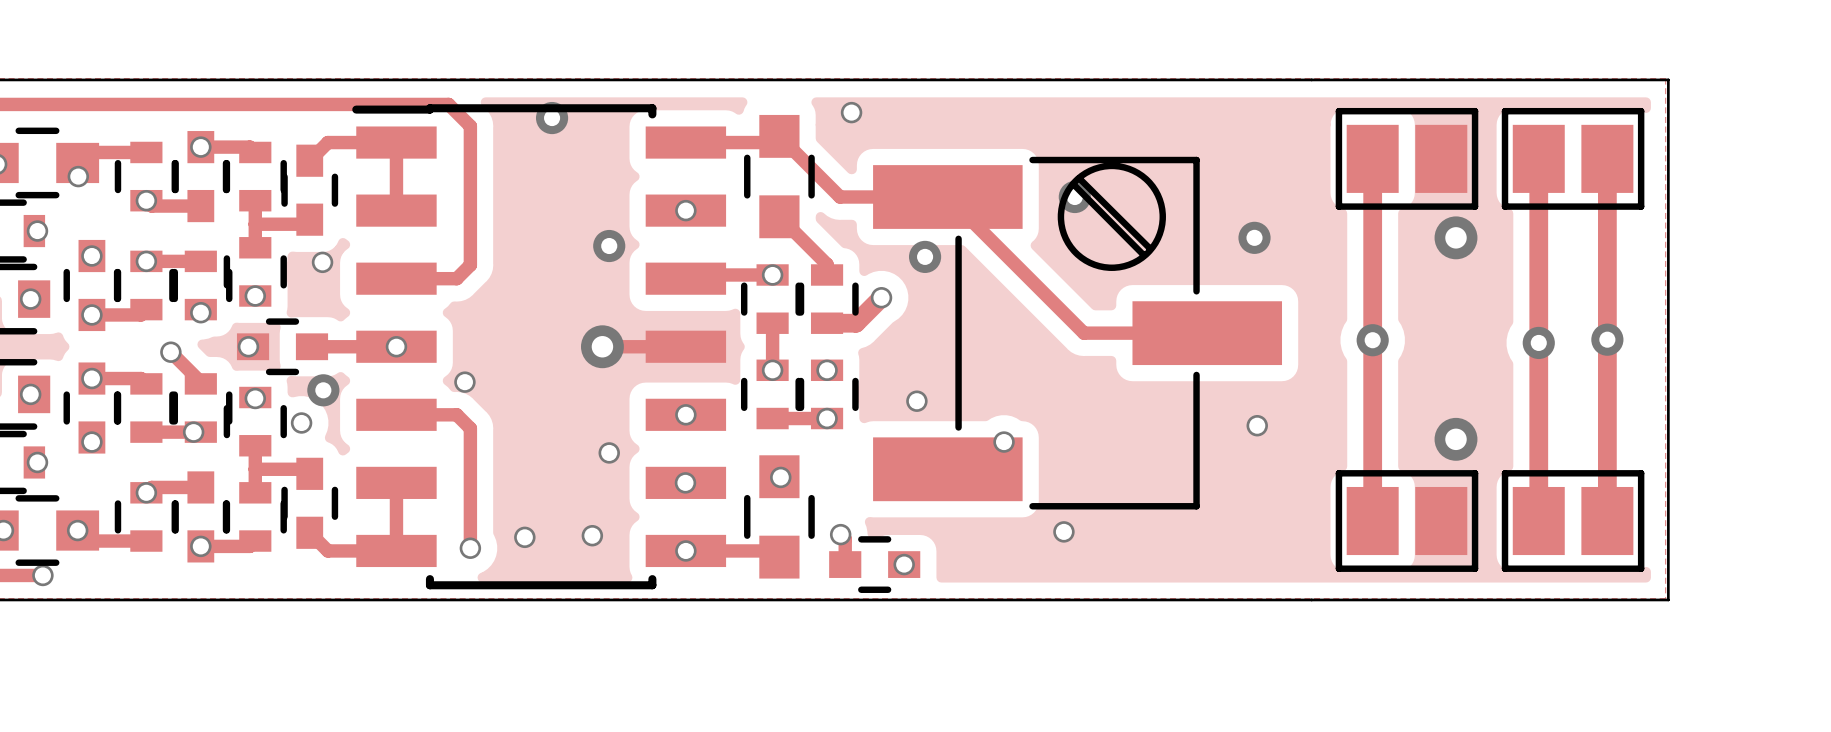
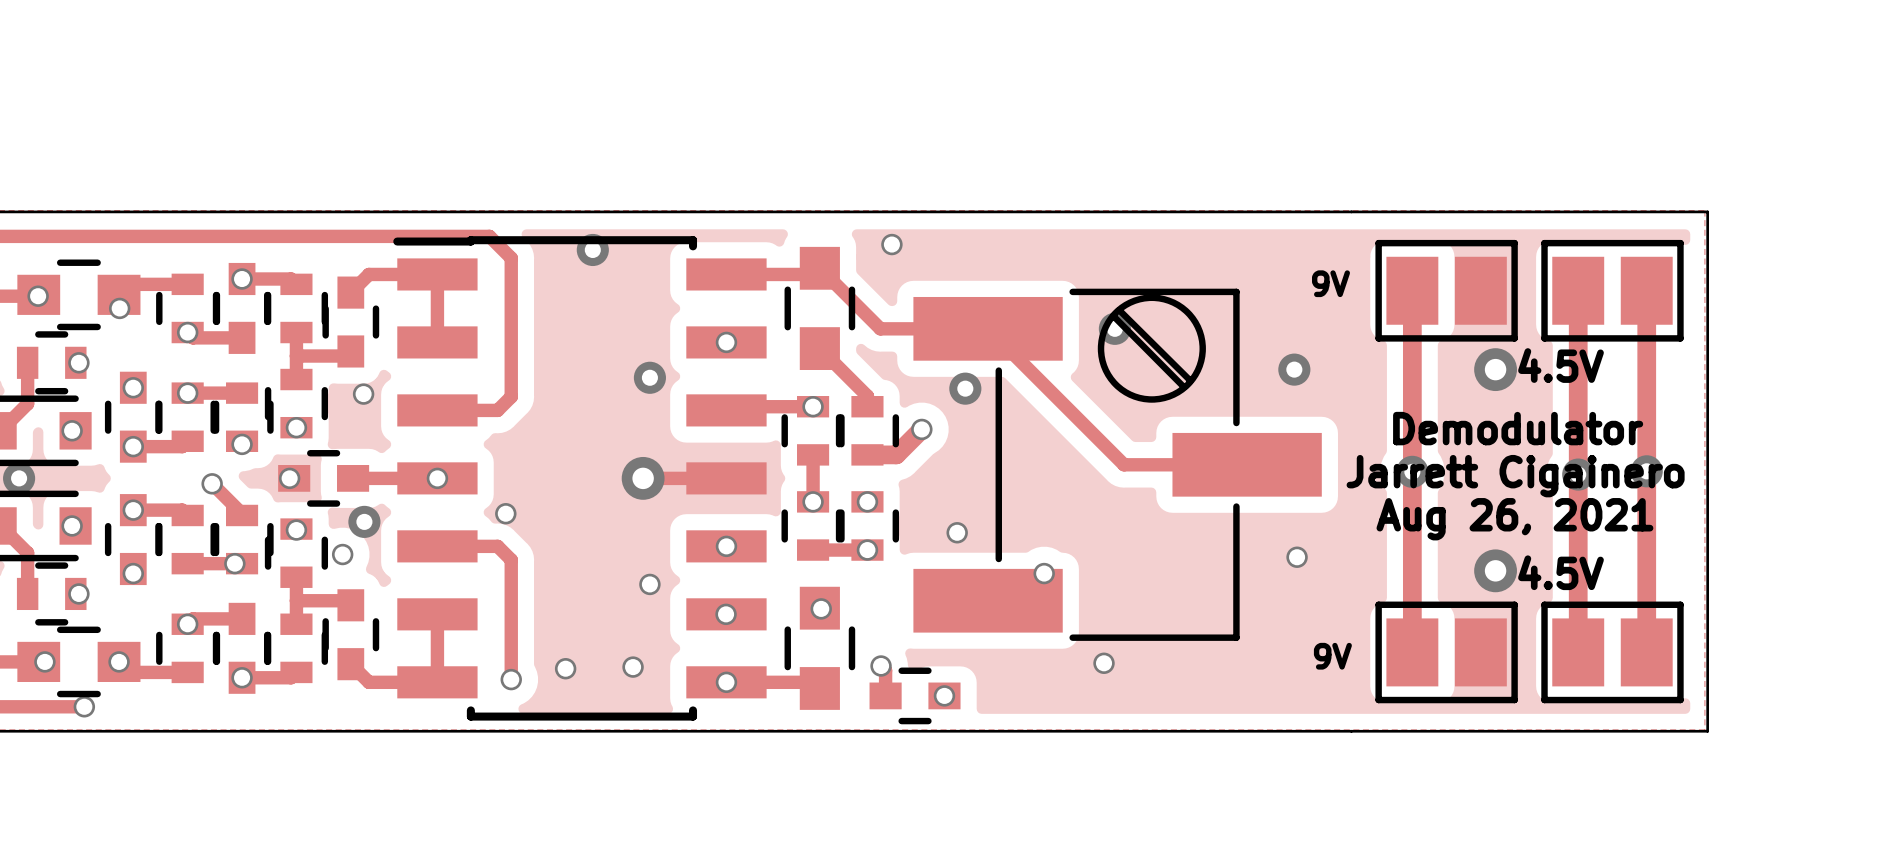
text: none -> 9V (1330, 283)
text: none -> 4.5V (1561, 365)
text: none -> Demodulator (1518, 428)
text: none -> Jarrett Cigainero (1515, 476)
text: none -> Aug 26, 2021 (1514, 519)
text: none -> 4.5V (1561, 572)
text: none -> 9V (1332, 656)

